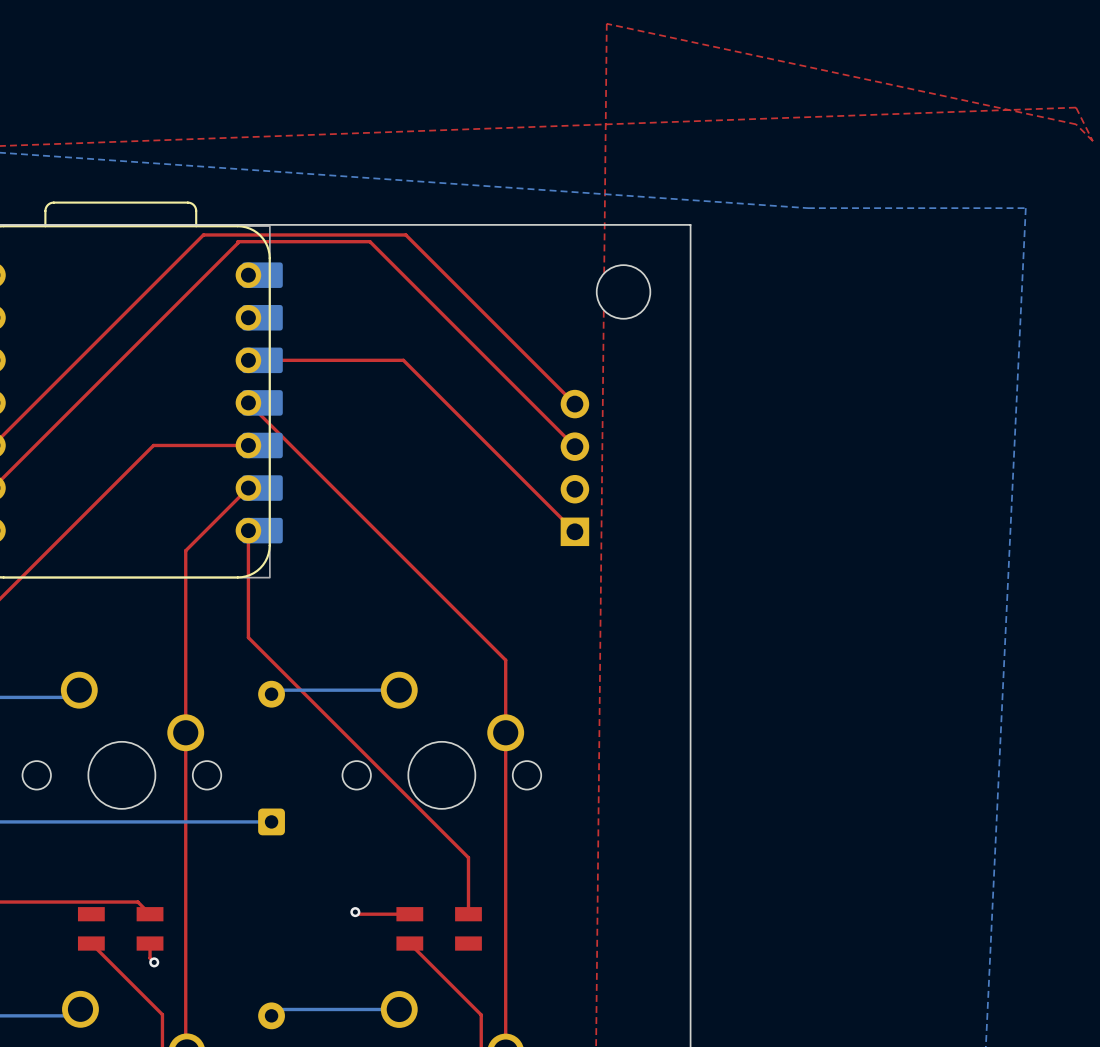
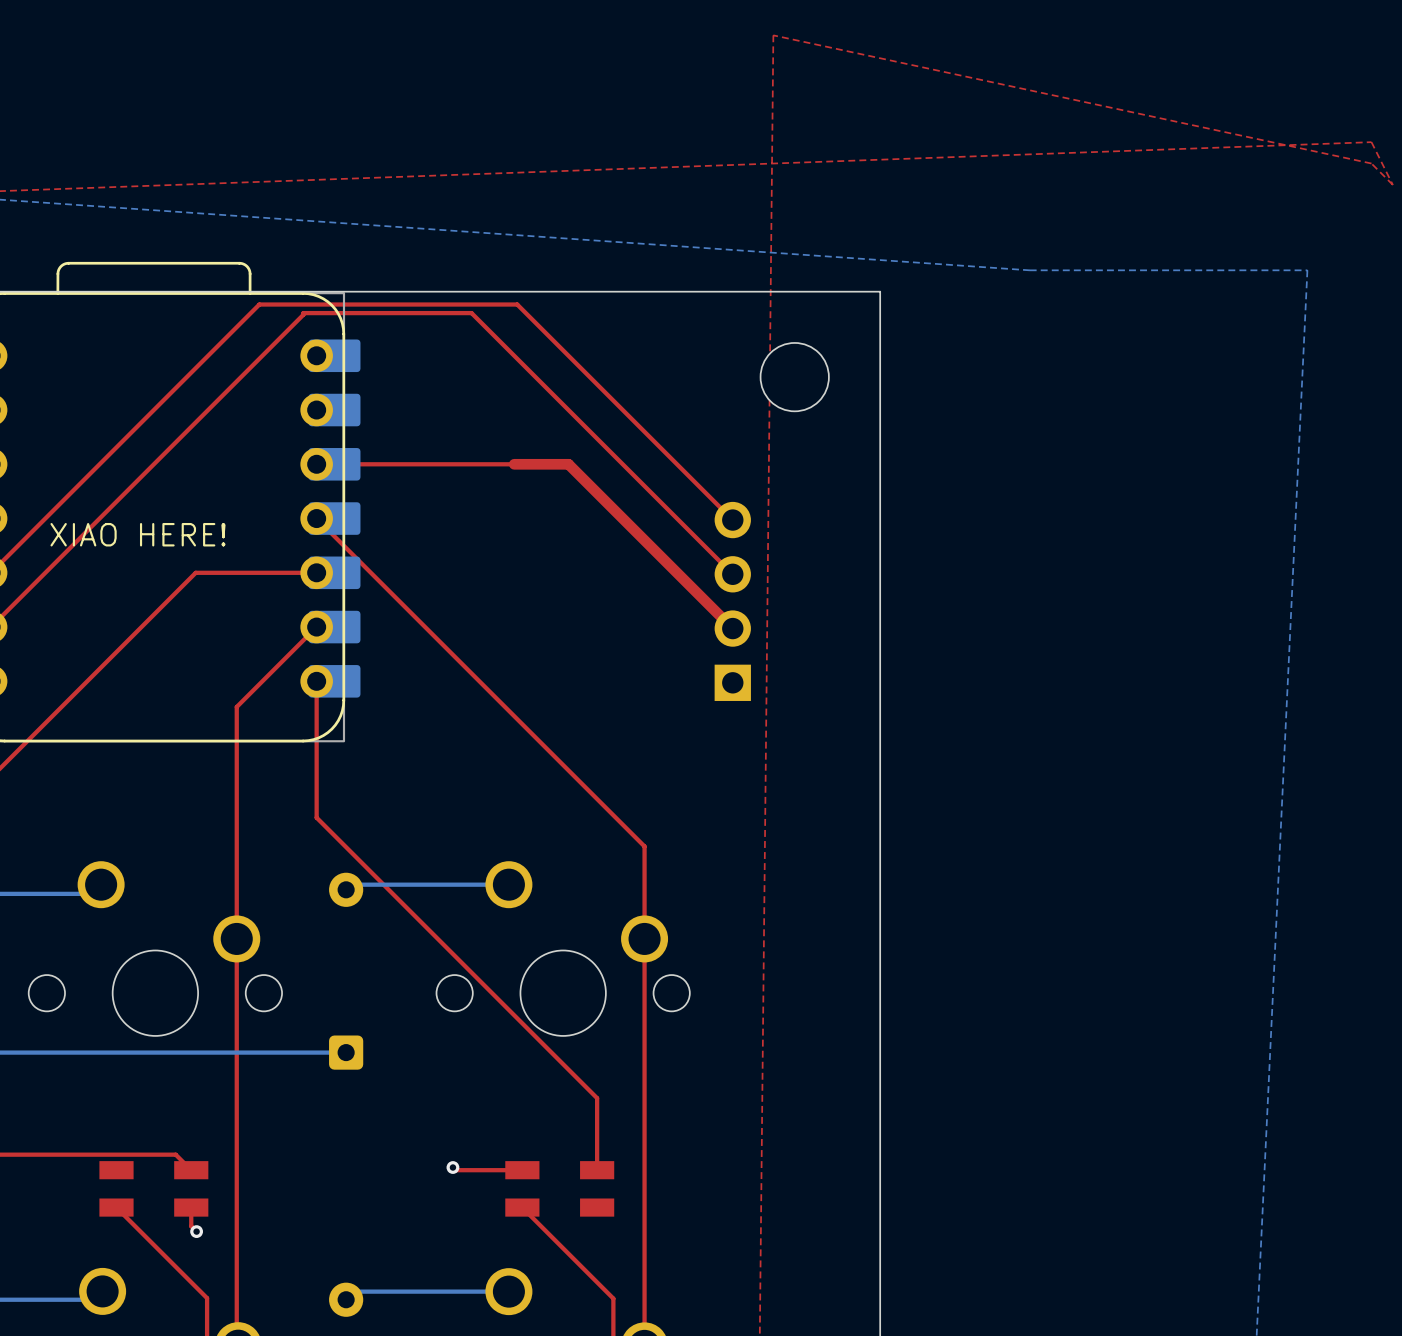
top track: (403, 360) (574, 531) -> (514, 464) (568, 464) (732, 628)
text: none -> XIAO HERE! (137, 534)

